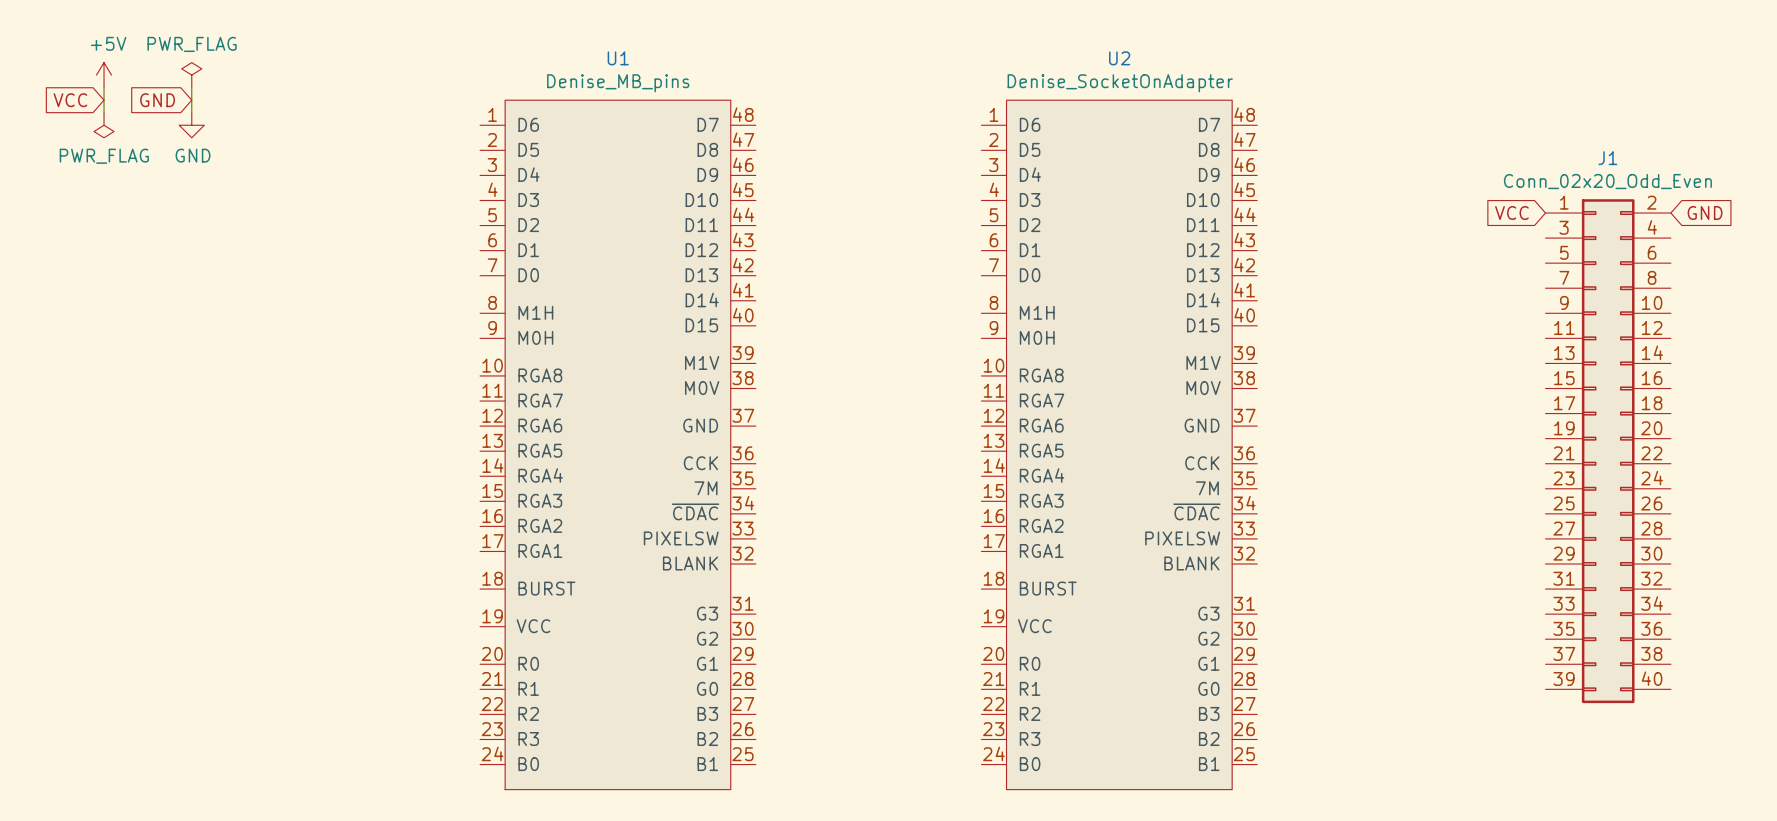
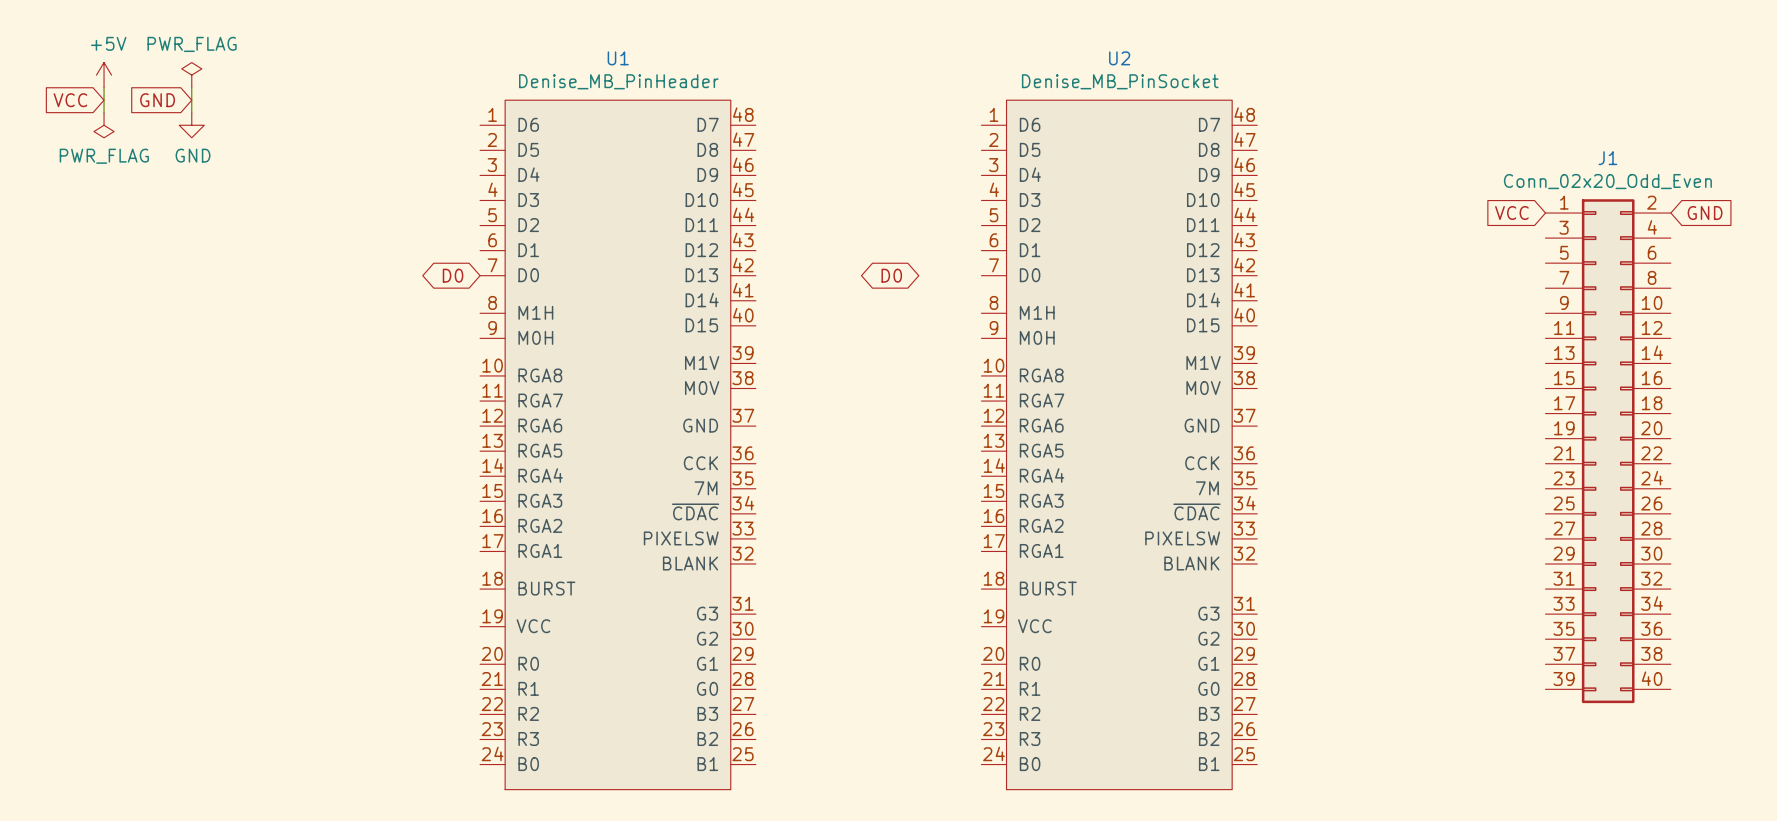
U1 value: Denise_MB_pins (618, 83) -> Denise_MB_PinHeader (618, 81)
U2 value: Denise_SocketOnAdapter (1120, 83) -> Denise_MB_PinSocket (1120, 81)
global label: none -> D0 (453, 275)
global label: none -> D0 (891, 275)

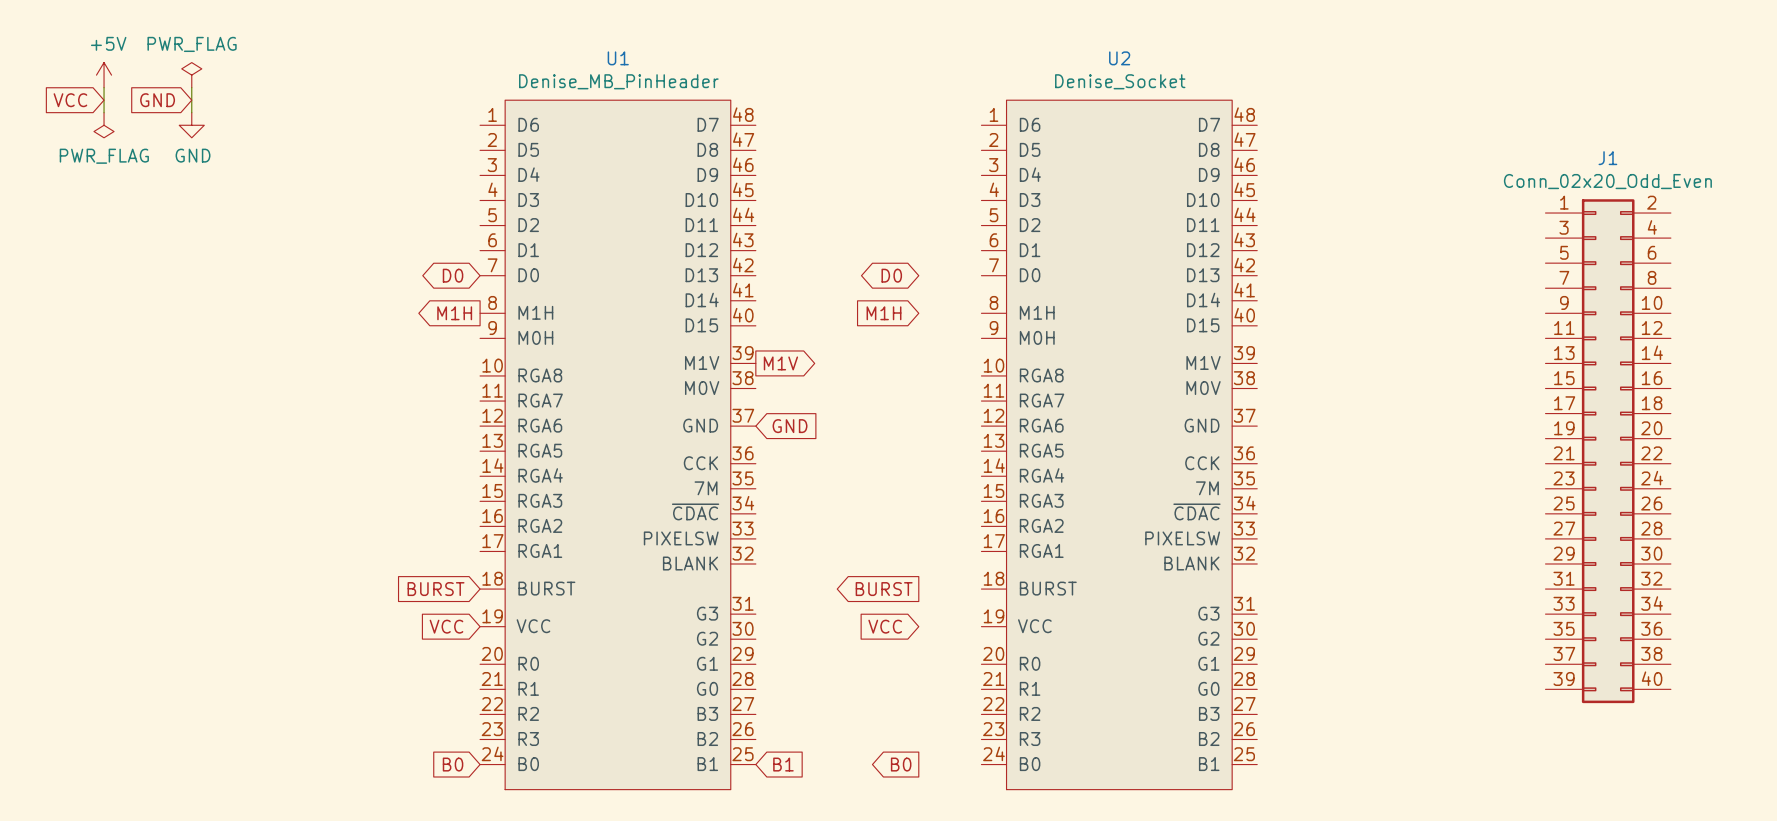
U2 value: Denise_MB_PinSocket (1120, 81) -> Denise_Socket (1120, 81)
global label: VCC (1511, 213) -> none
global label: GND (1705, 213) -> none
global label: none -> M1H (454, 313)
global label: none -> M1H (884, 313)
global label: none -> M1V (780, 363)
global label: none -> GND (790, 426)
global label: none -> BURST (436, 589)
global label: none -> BURST (884, 589)
global label: none -> VCC (446, 626)
global label: none -> VCC (885, 626)
global label: none -> B0 (453, 764)
global label: none -> B1 (783, 764)
global label: none -> B0 (901, 764)

